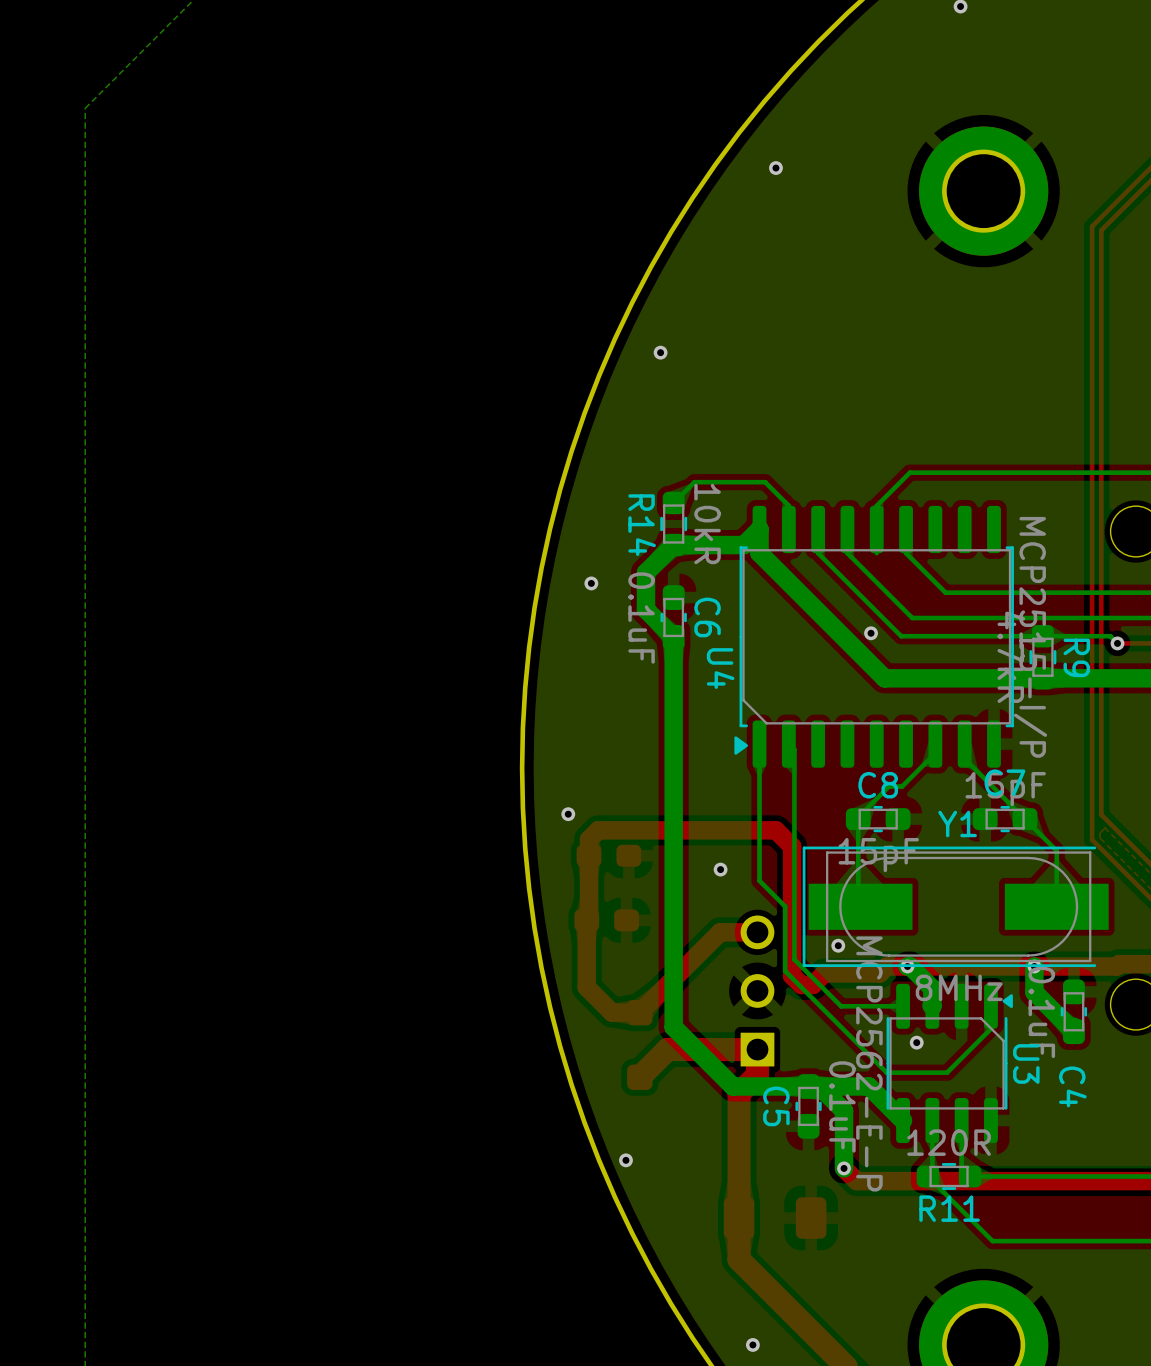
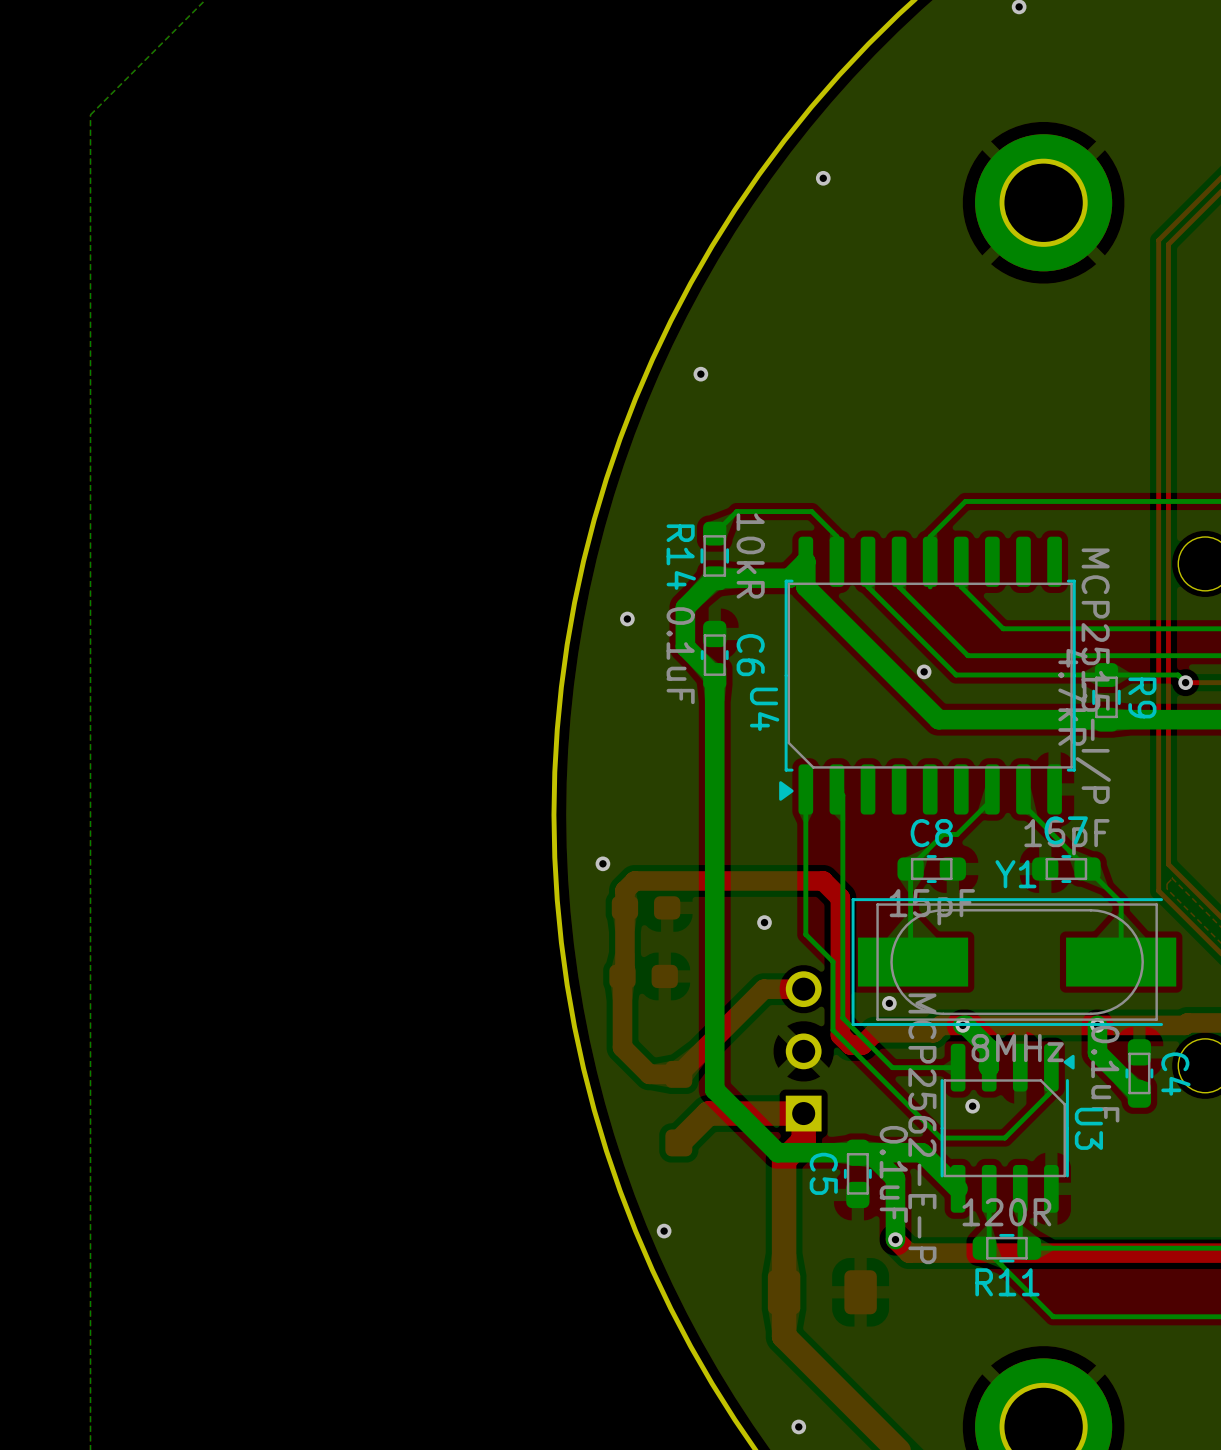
C4 name position: C4 (1072, 1086) -> C4 (1175, 1074)

